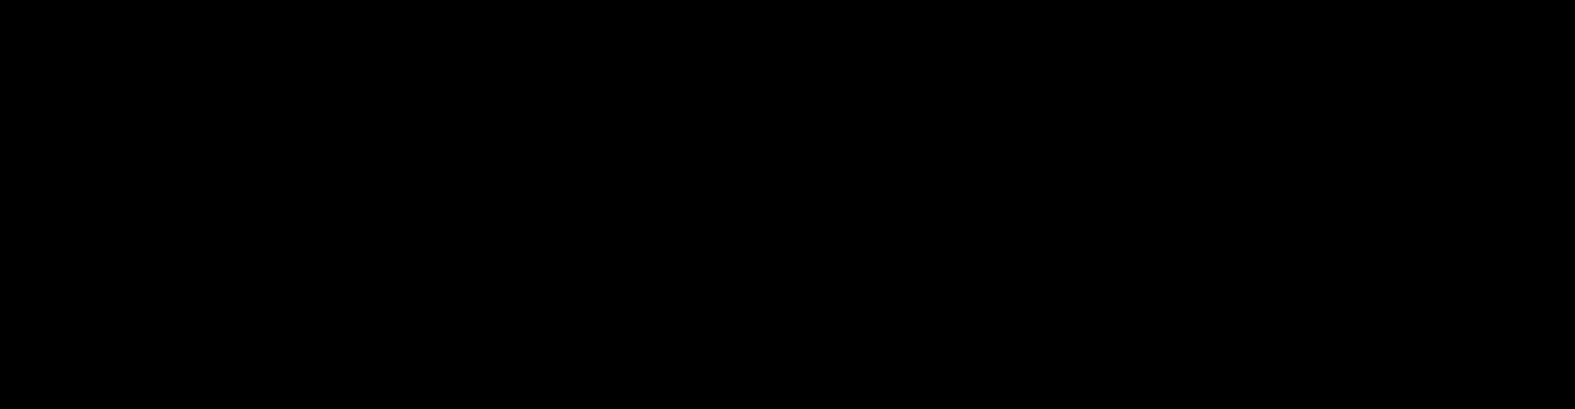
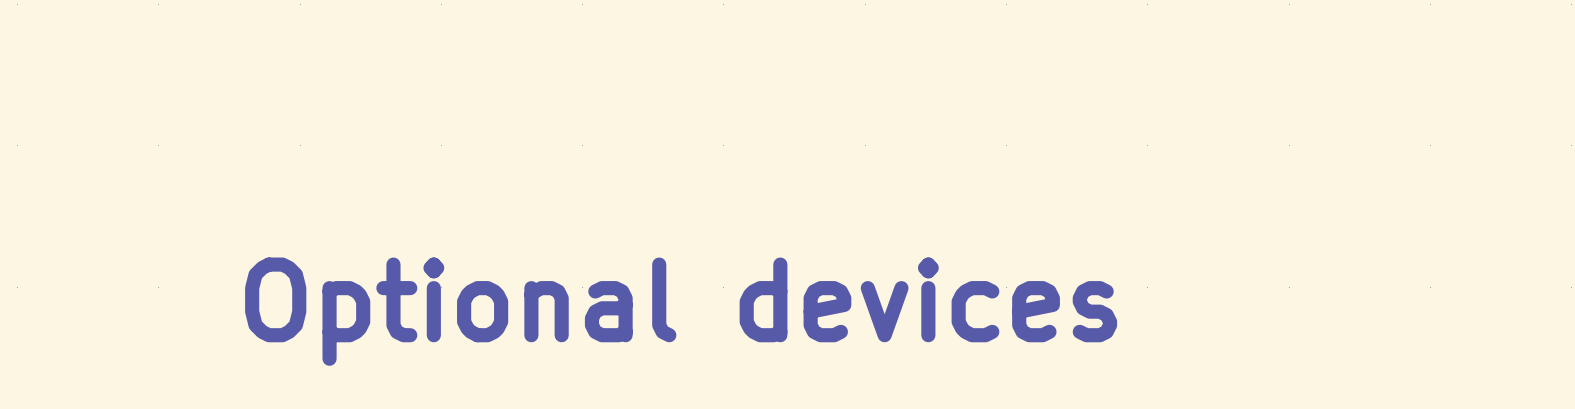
text: none -> Optional devices (681, 311)

